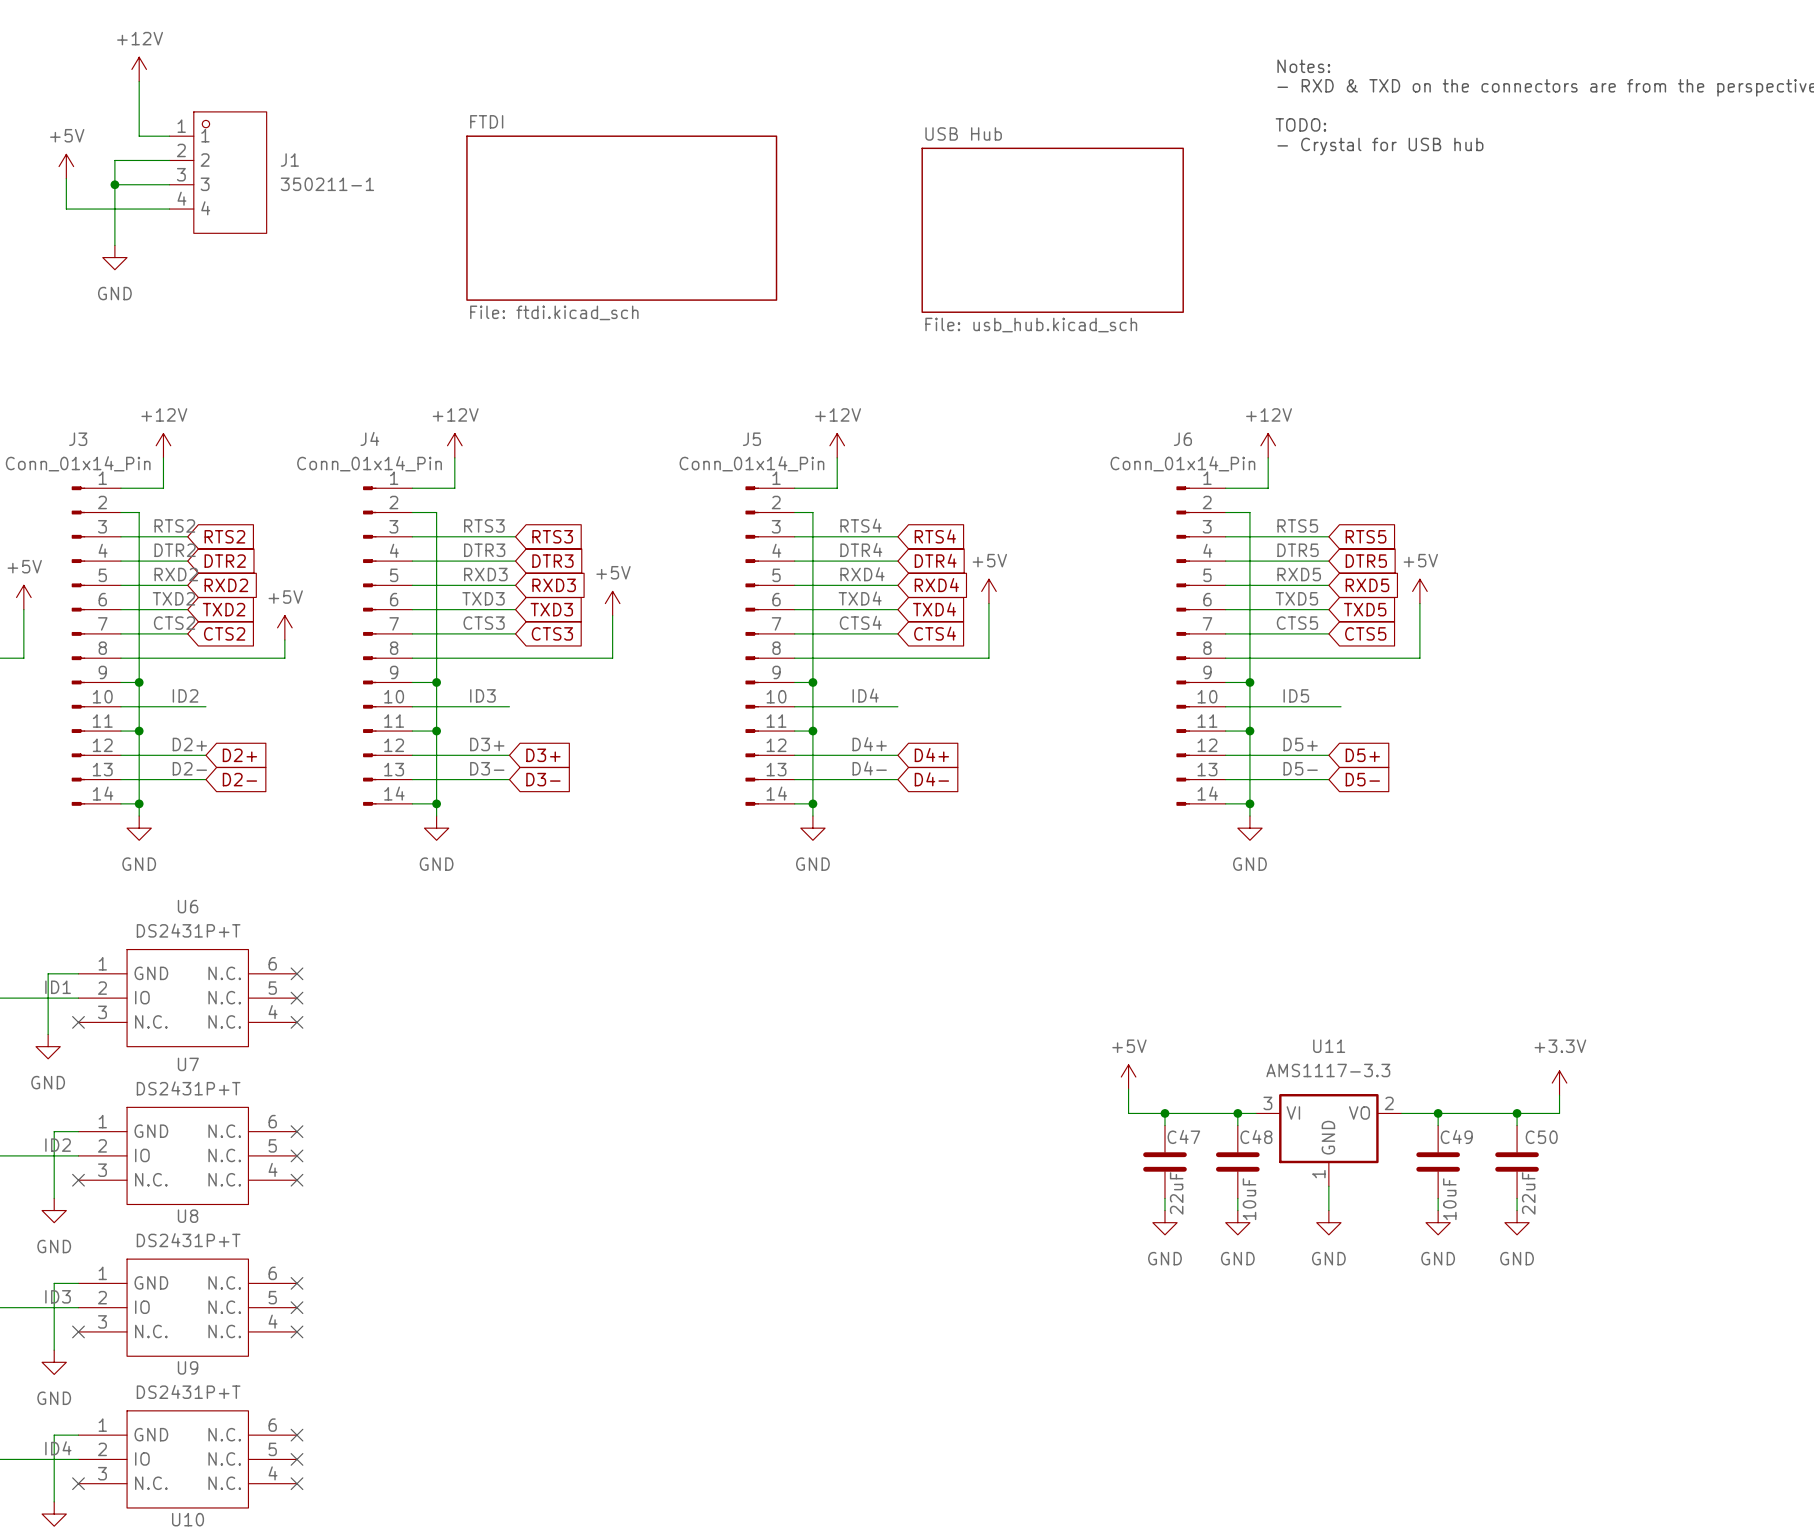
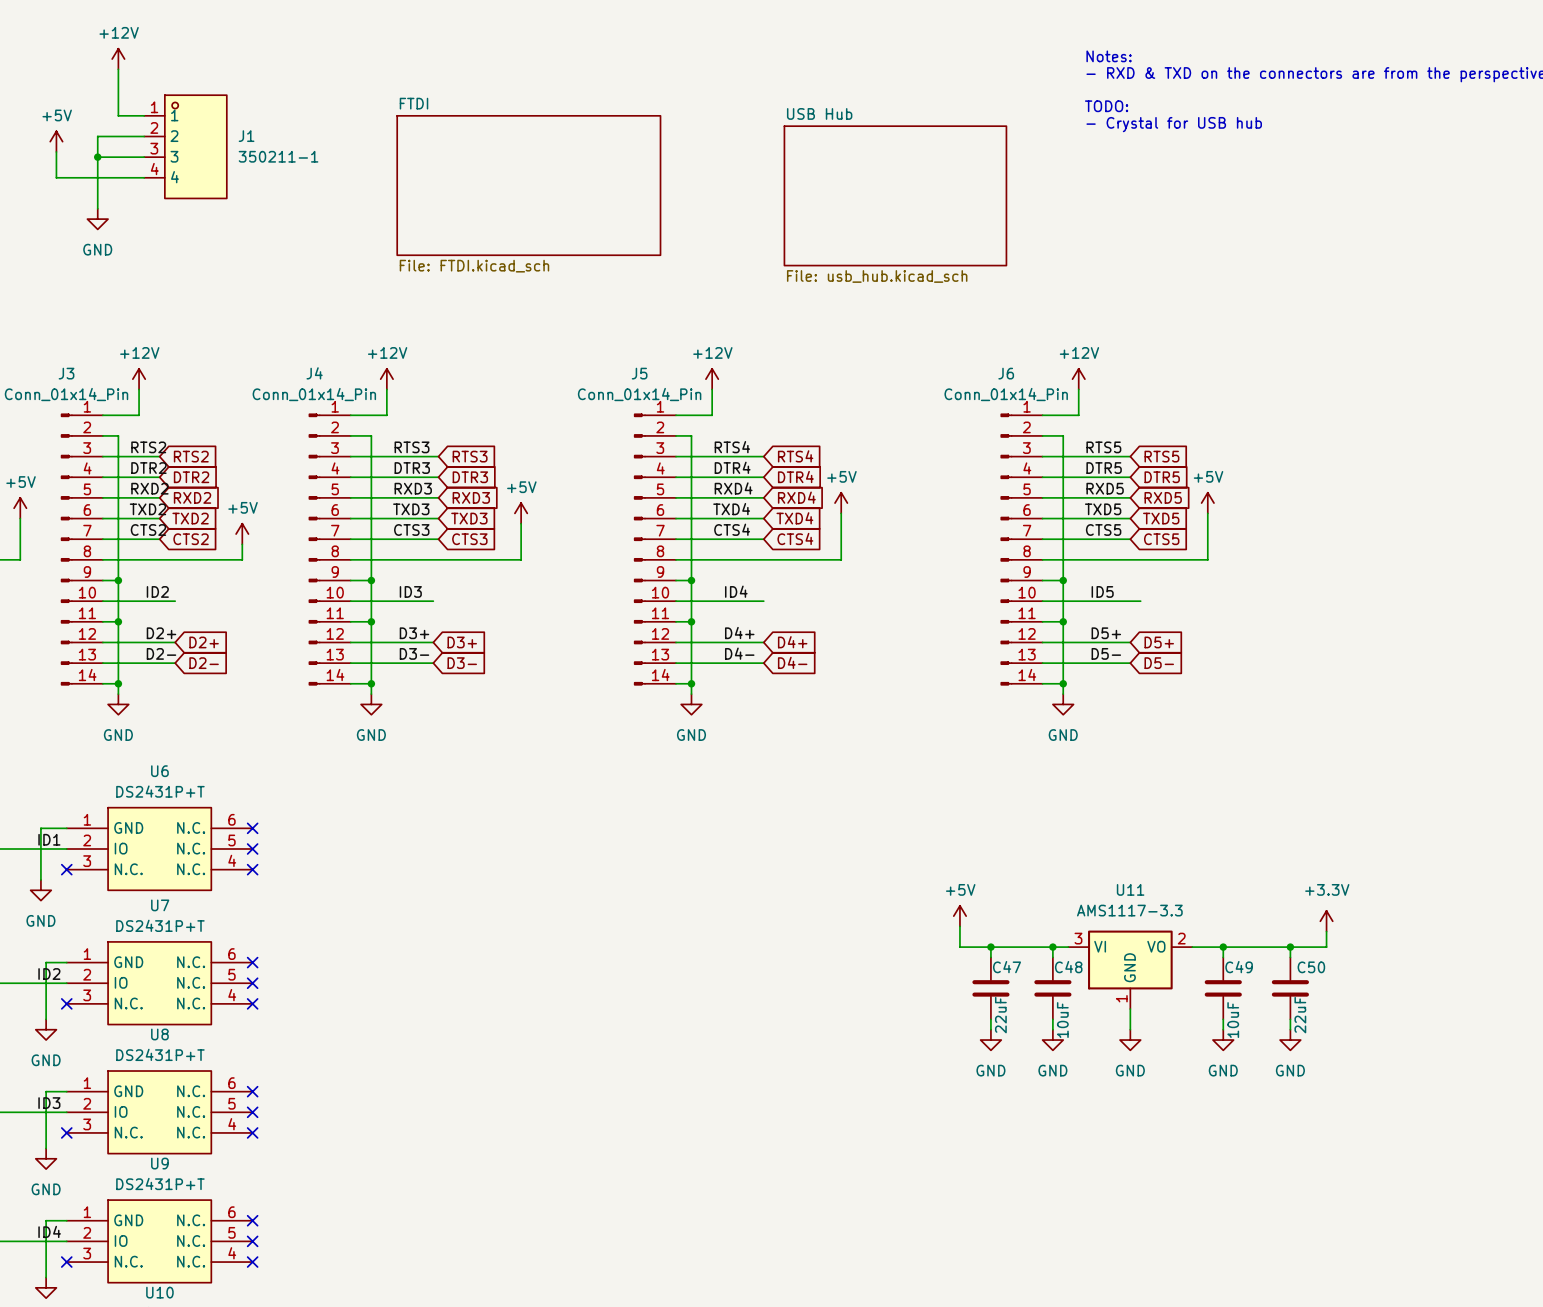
sheet FTDI value: File: ftdi.kicad_sch (554, 312) -> File: FTDI.kicad_sch (474, 266)

